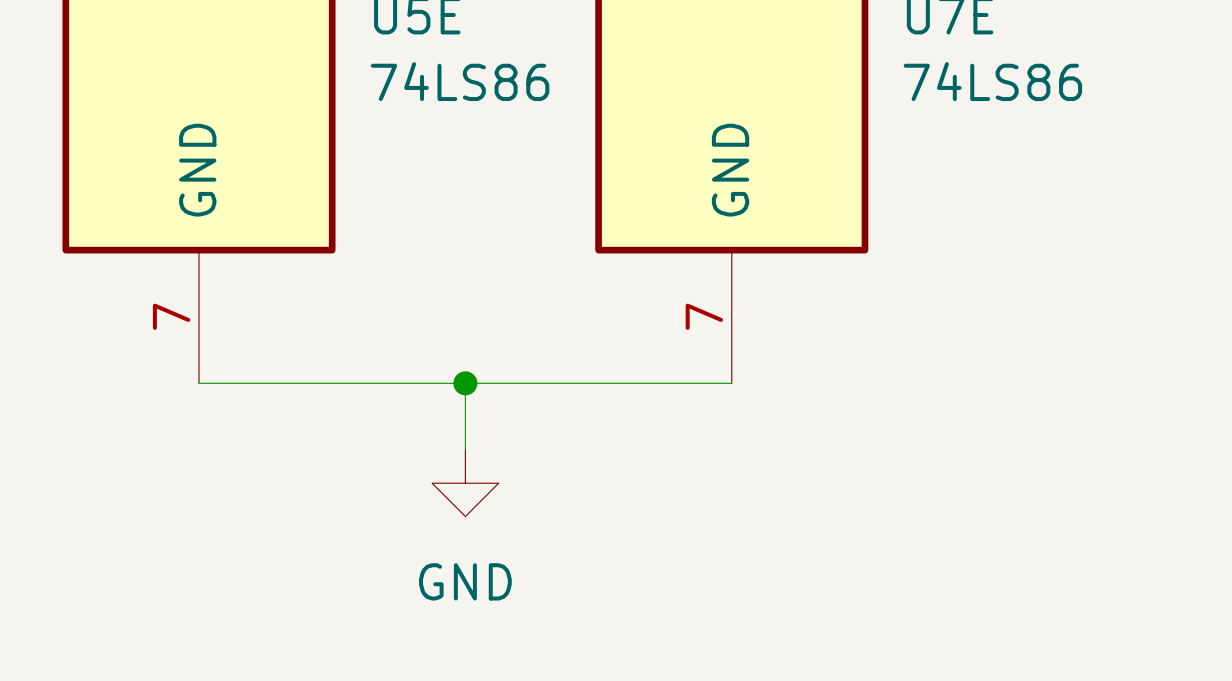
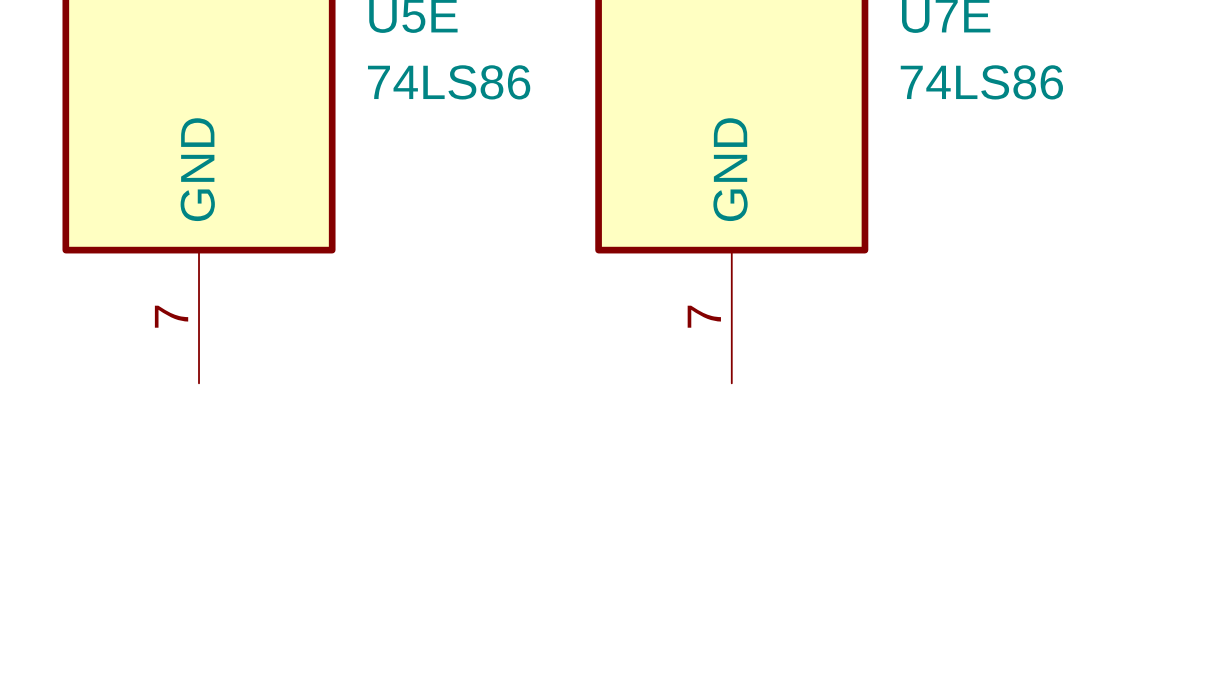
wire: (199, 383) (731, 383) -> none
wire: (465, 383) (465, 449) -> none
junction: (465, 383) -> none
power symbol: GND (465, 483) -> none

